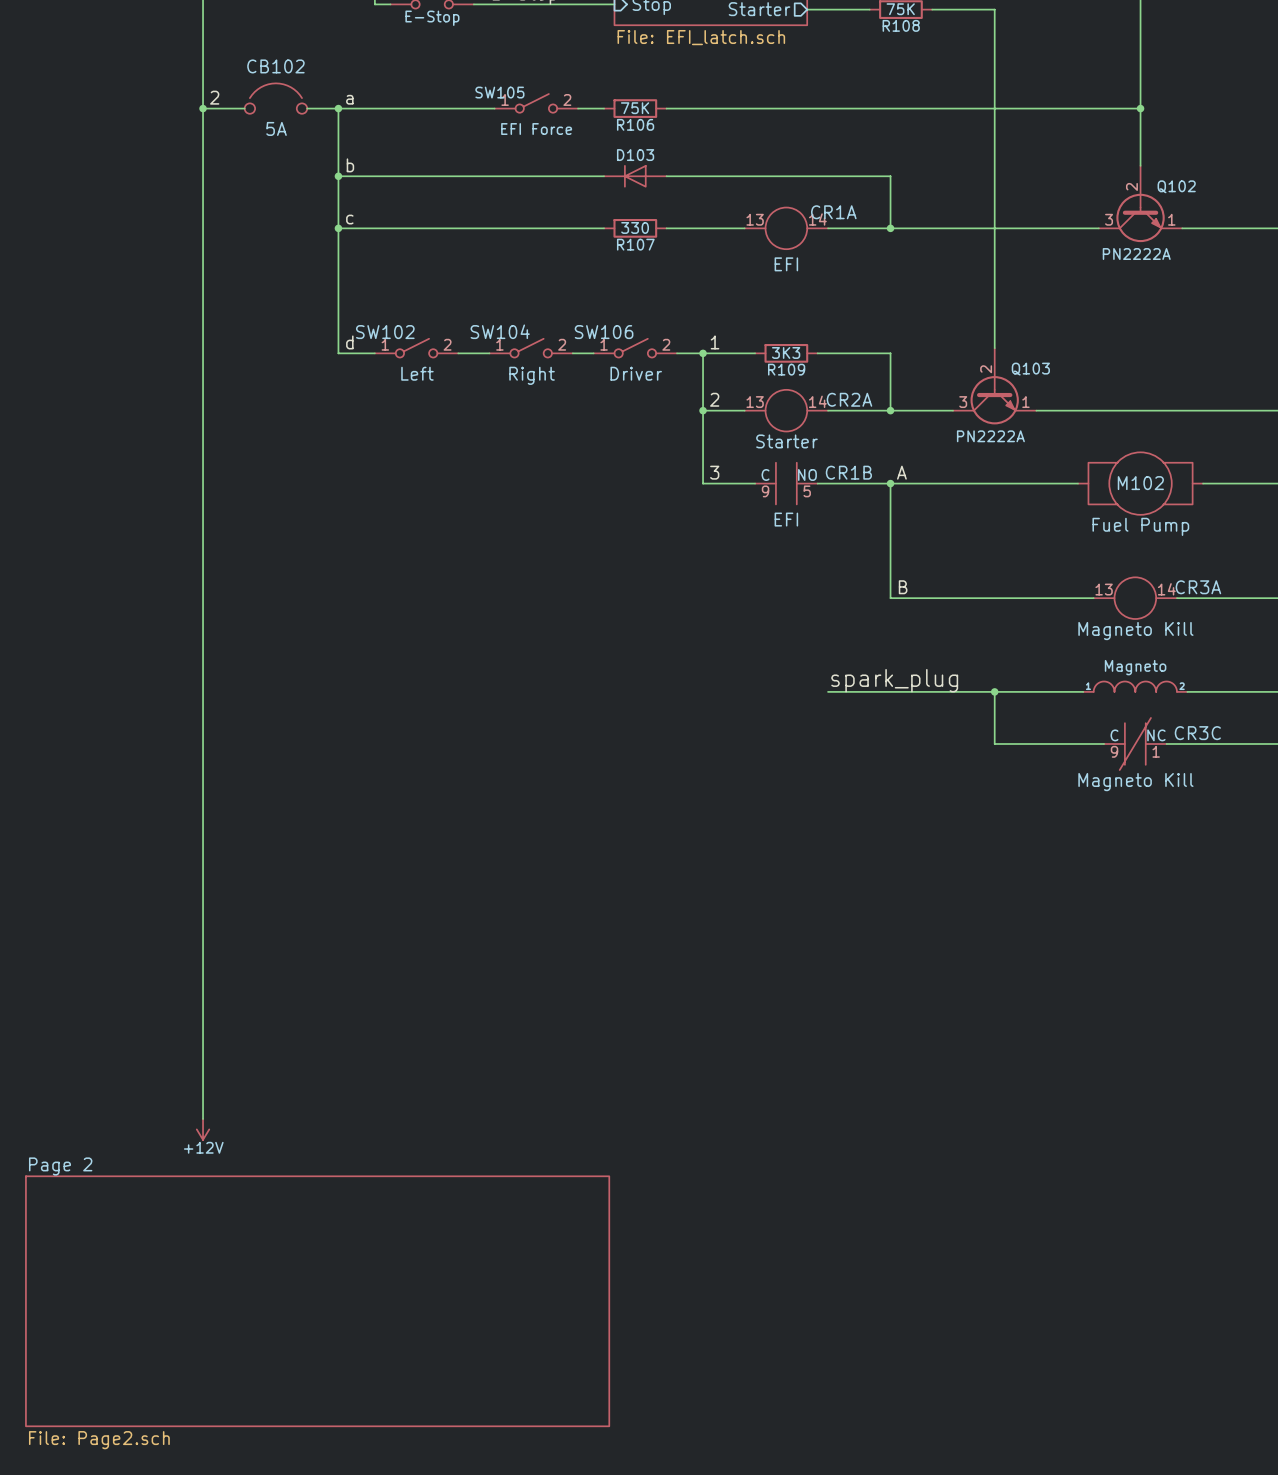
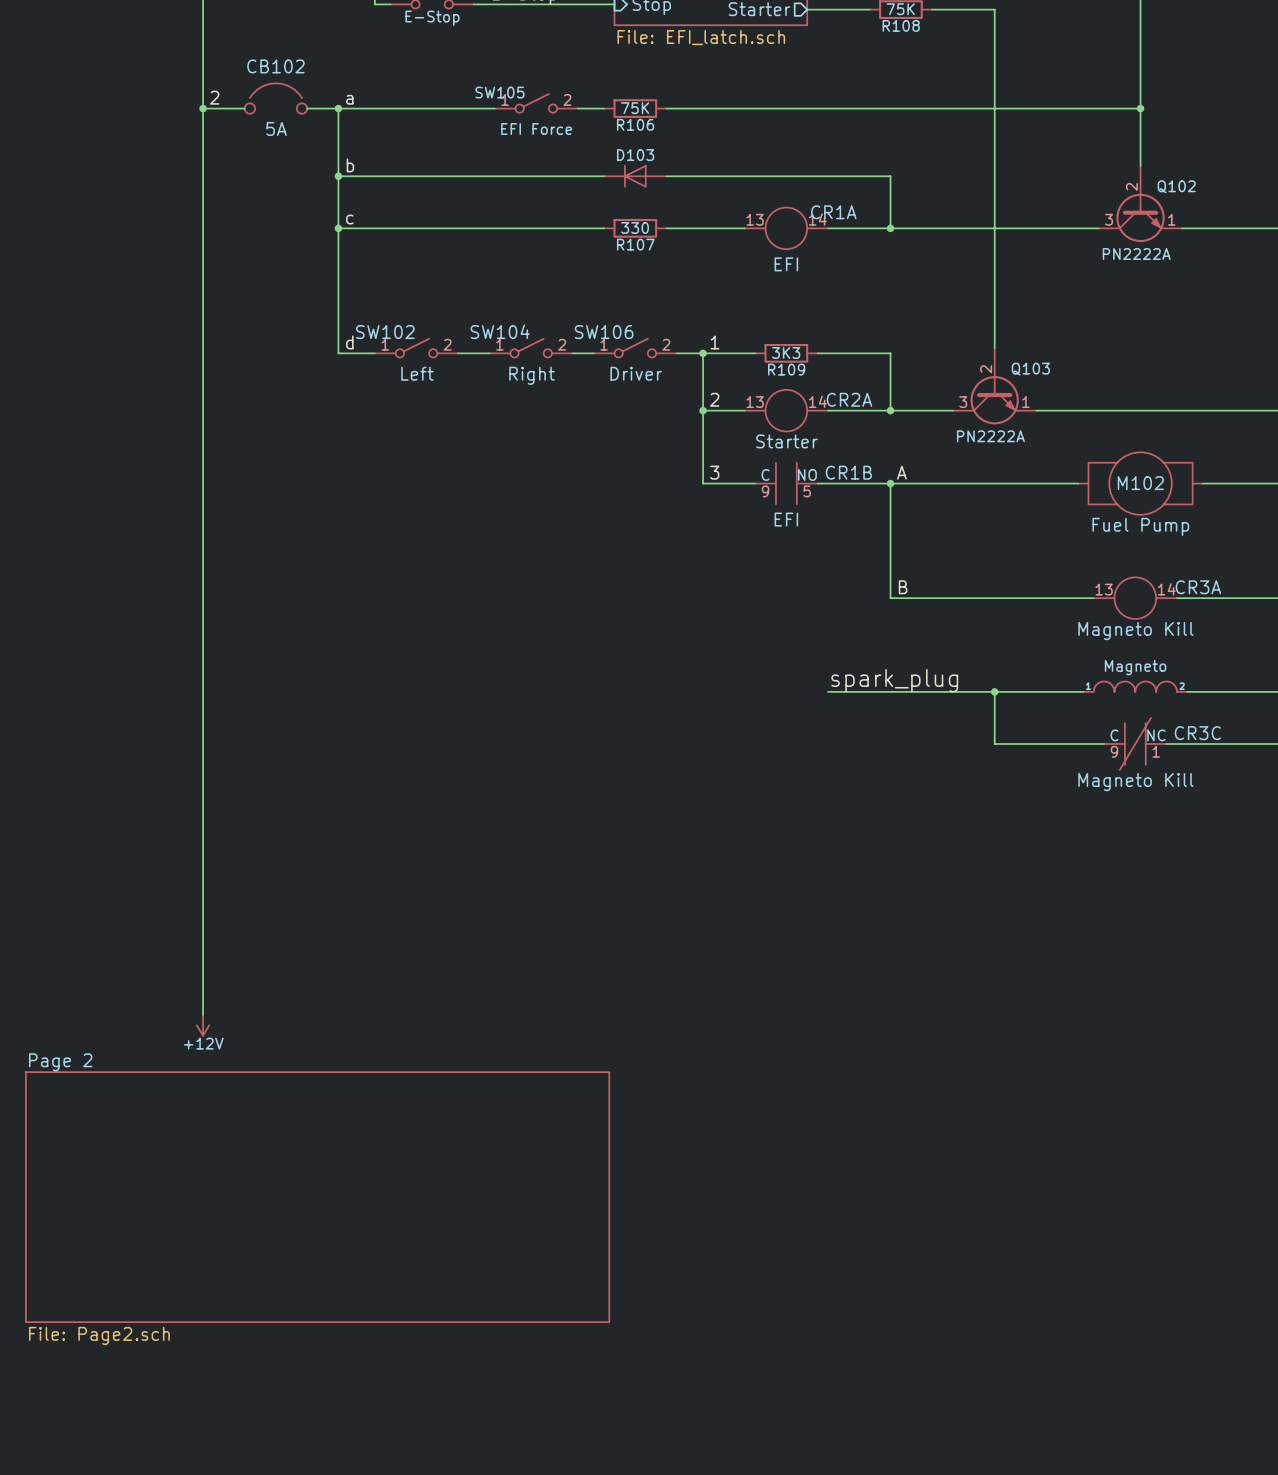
wire: (203, 1014) (203, 1119) -> none
power symbol position: +12V (203, 1129) -> +12V (203, 1025)
sheet Page 2 position: (317, 1301) -> (317, 1197)

